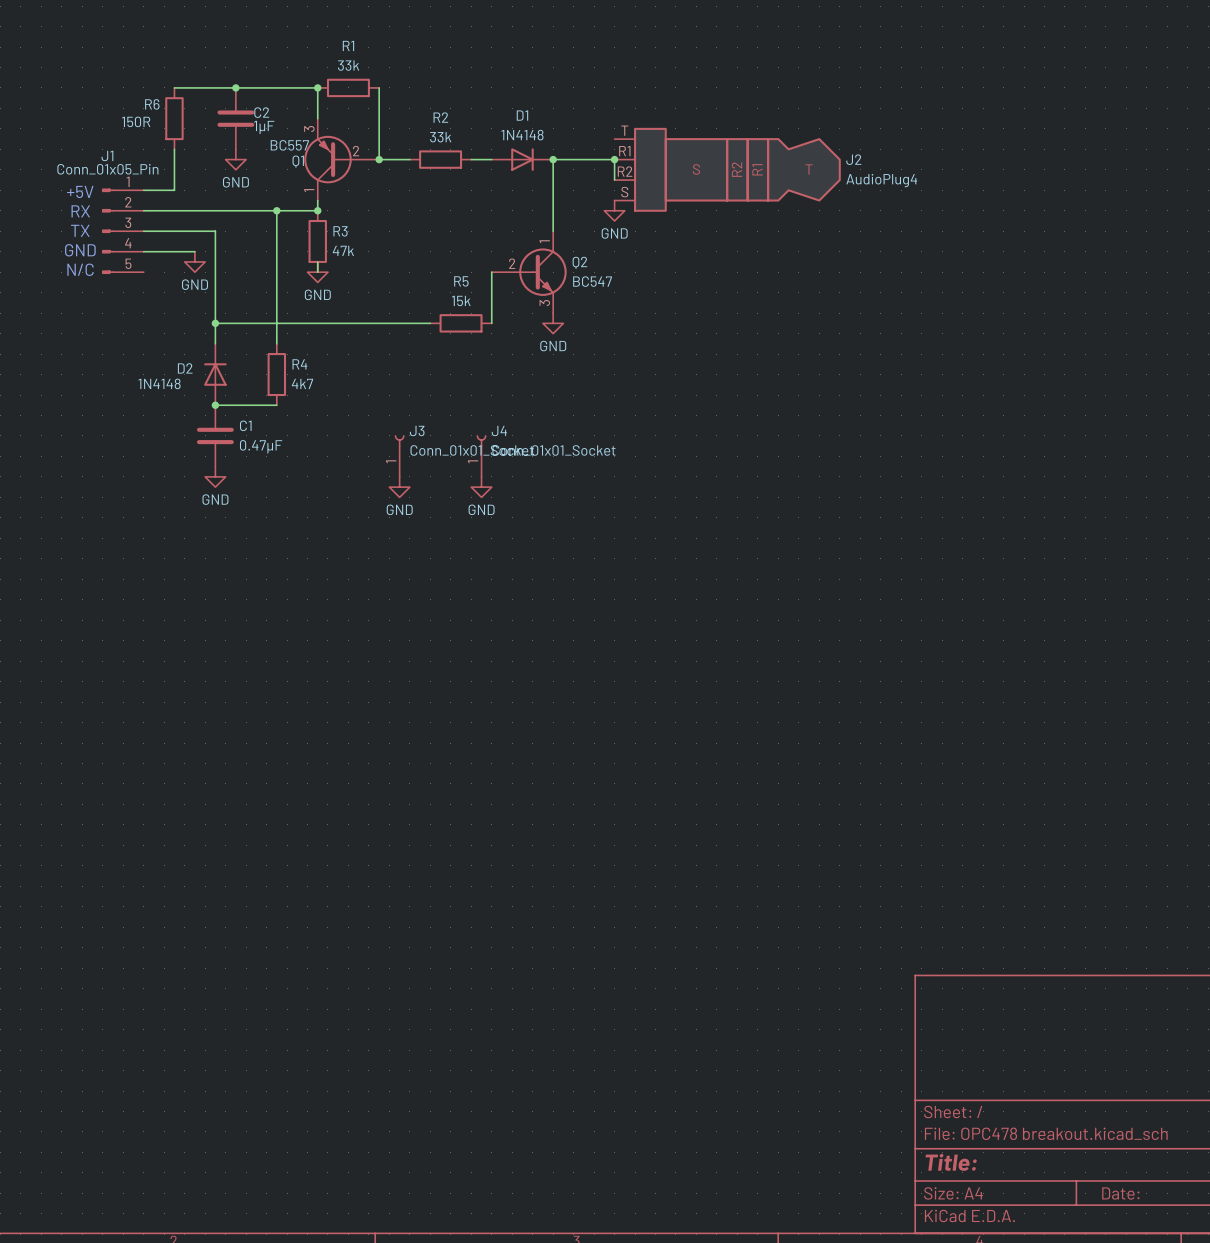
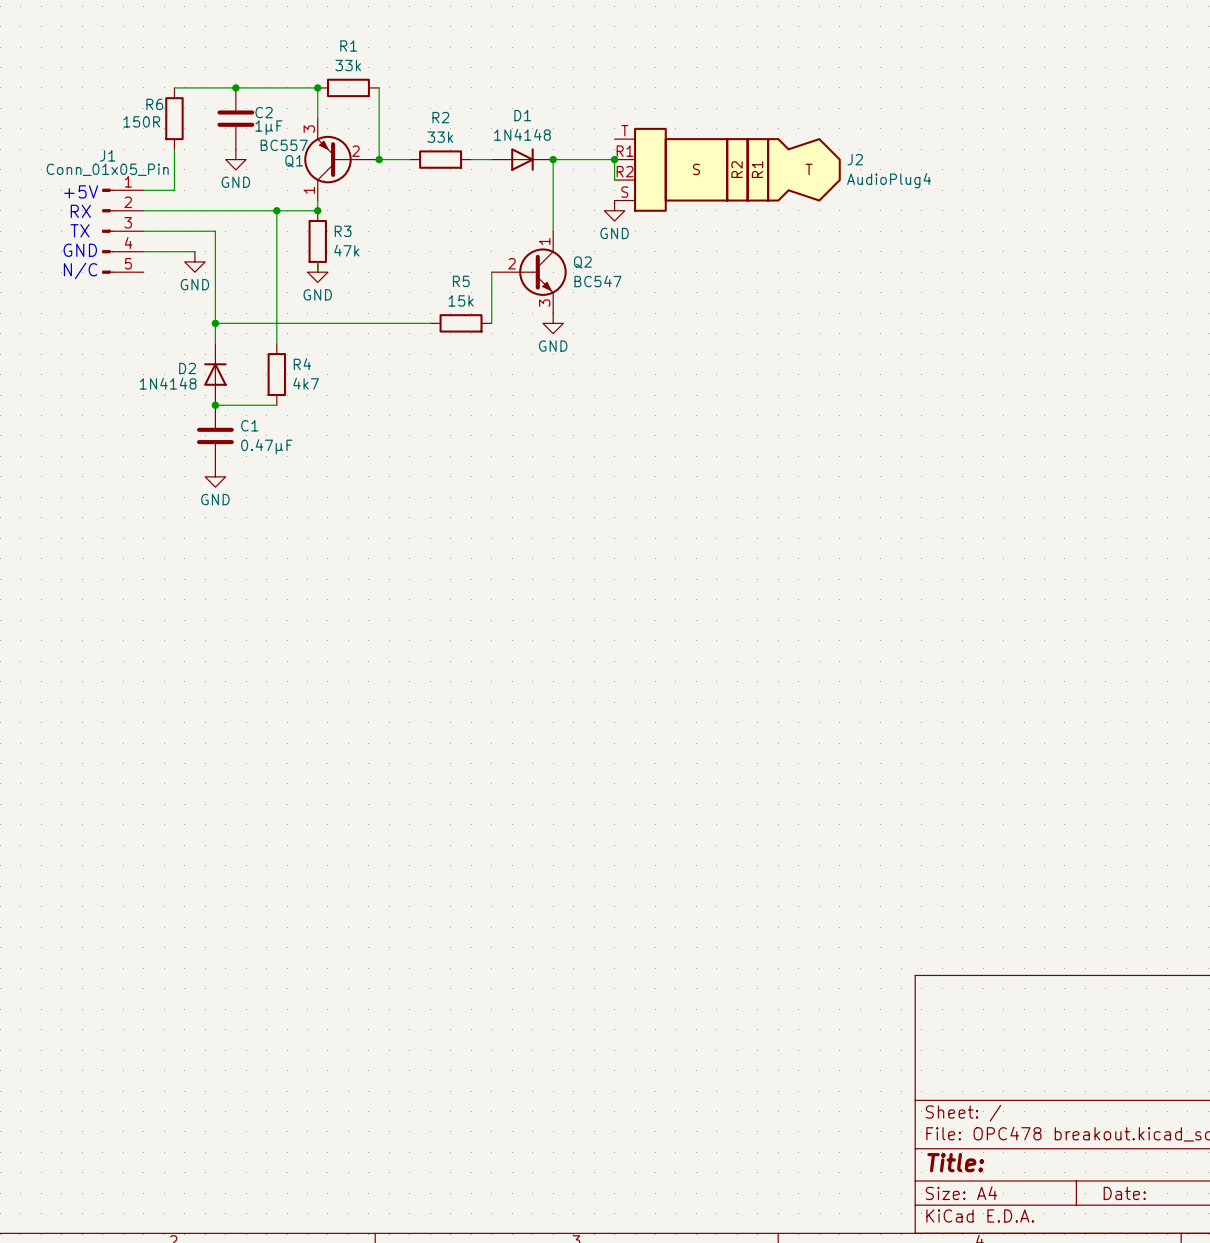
J3: Conn_01x01_Socket (399, 456) -> none
J4: Conn_01x01_Socket (481, 456) -> none
power symbol: GND (399, 487) -> none
power symbol: GND (481, 487) -> none

